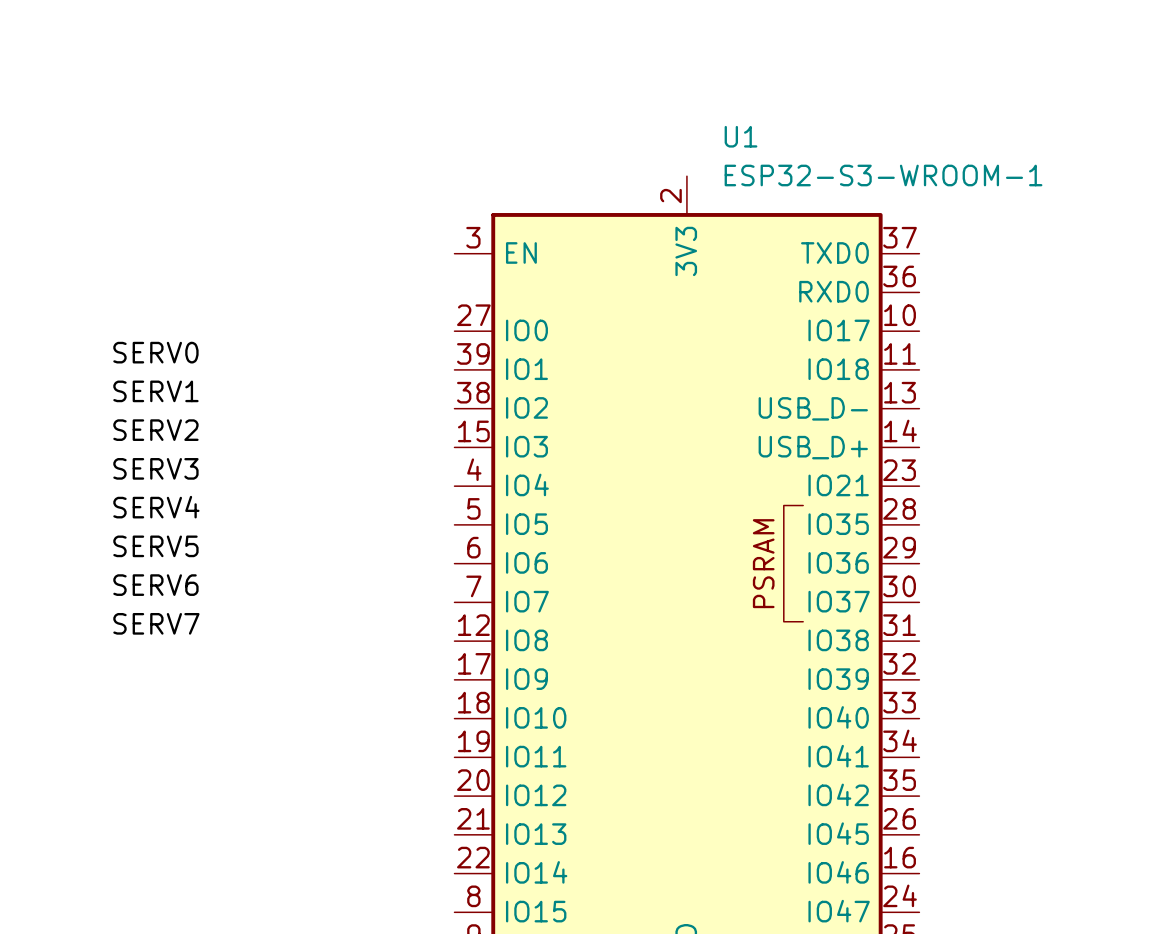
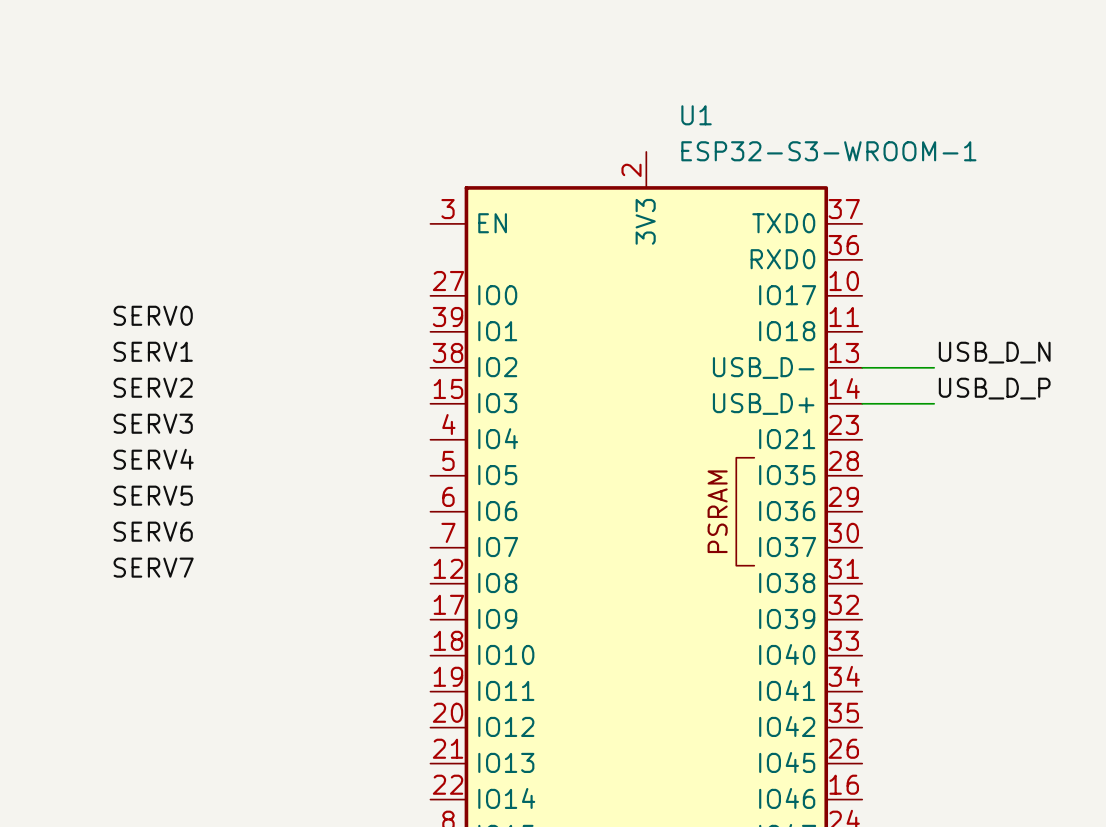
label: none -> USB_D_N (994, 352)
wire: none -> (862, 367) (934, 367)
label: none -> USB_D_P (994, 388)
wire: none -> (862, 403) (934, 403)

